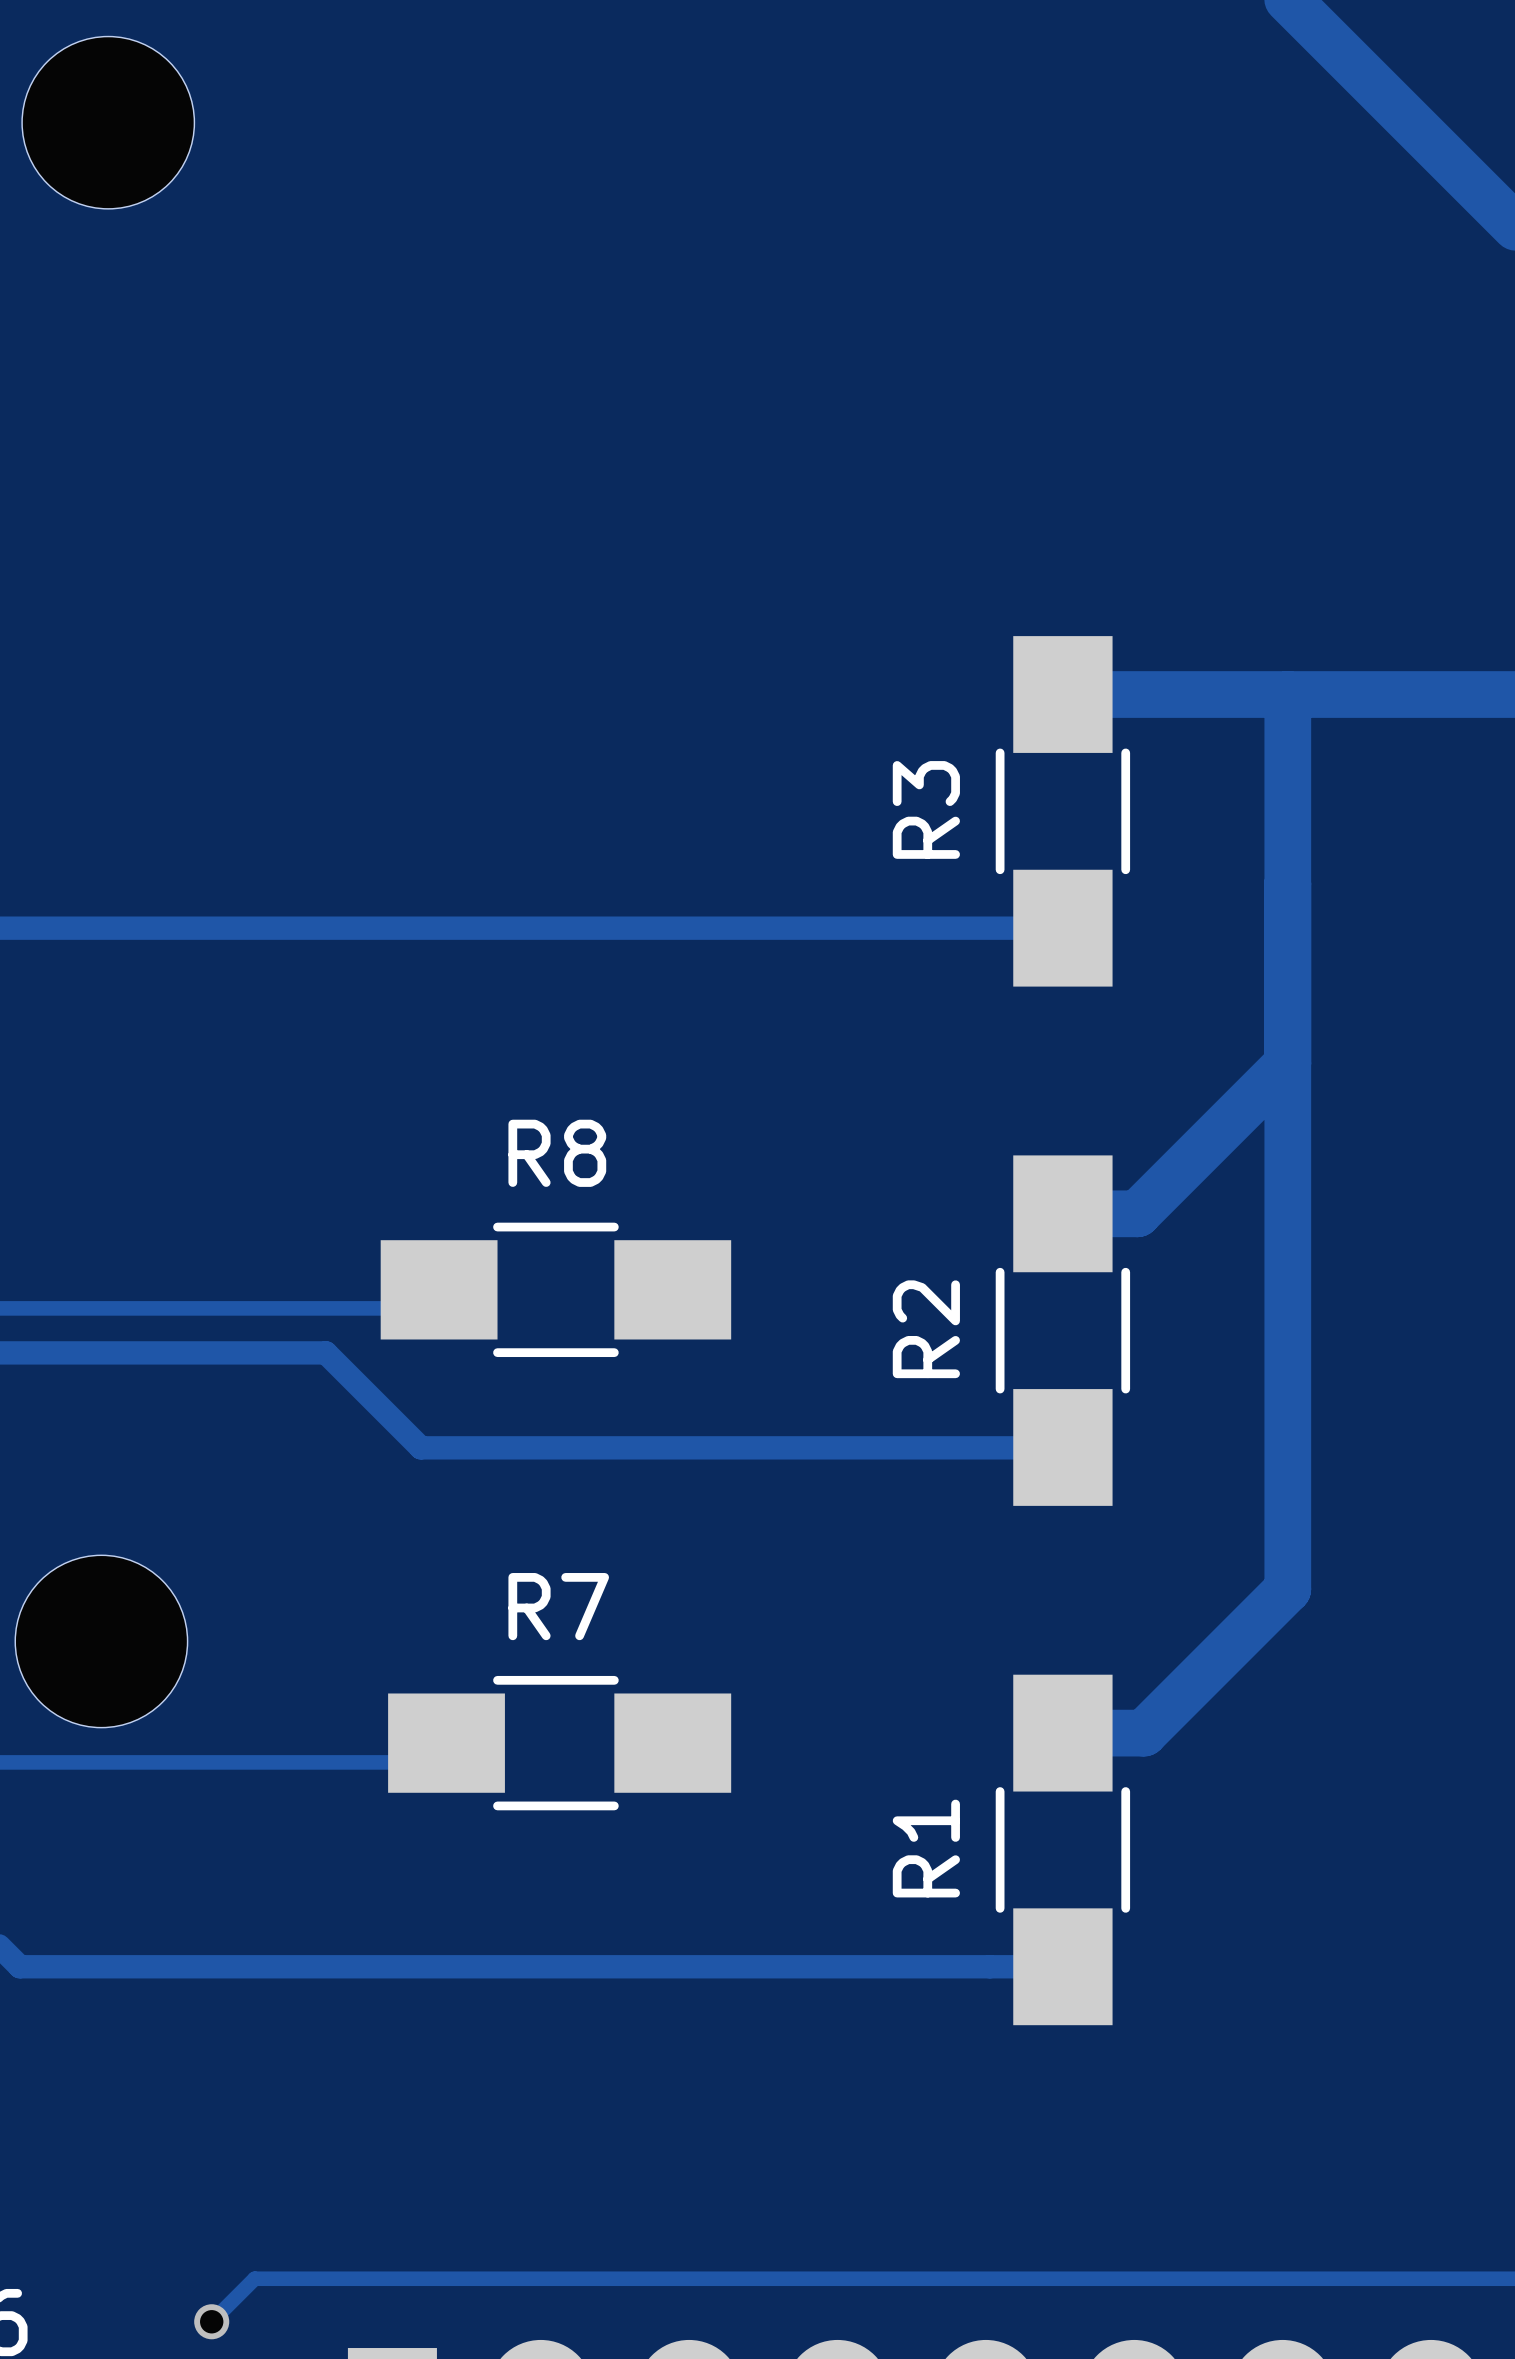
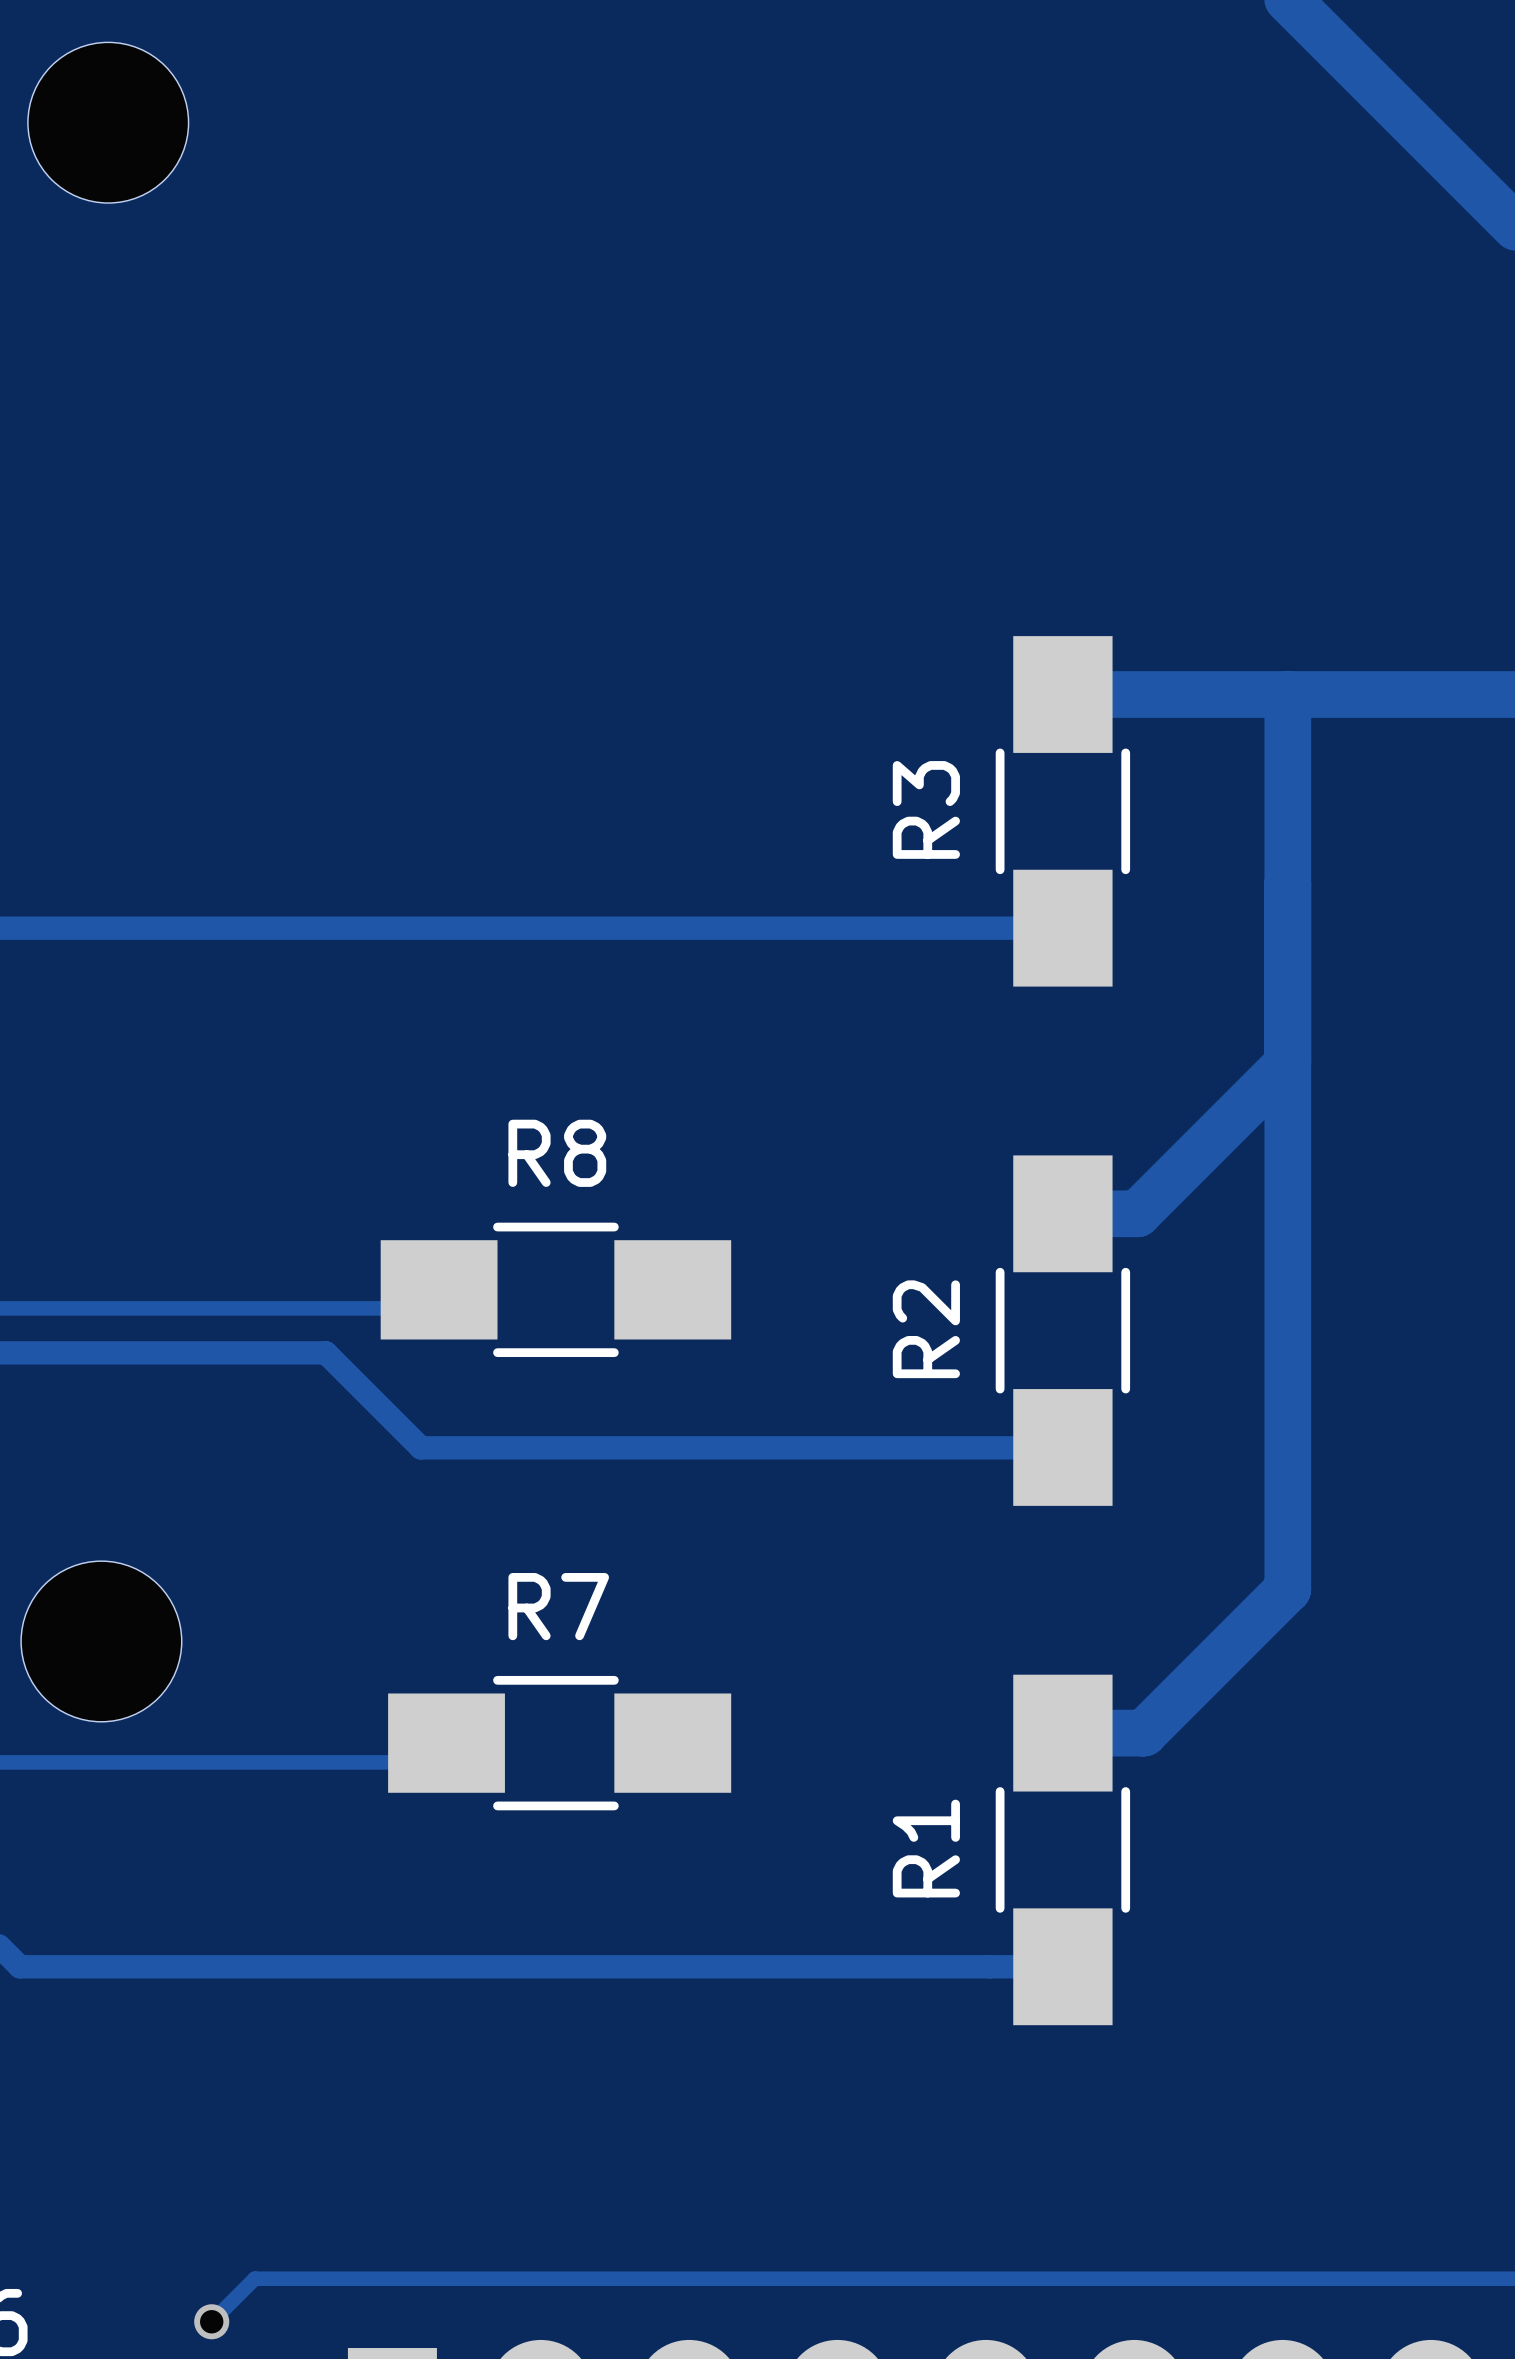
part footprint: [22, 36, 195, 209] -> [27, 42, 189, 204]
part footprint: [15, 1555, 188, 1728] -> [21, 1561, 182, 1722]

